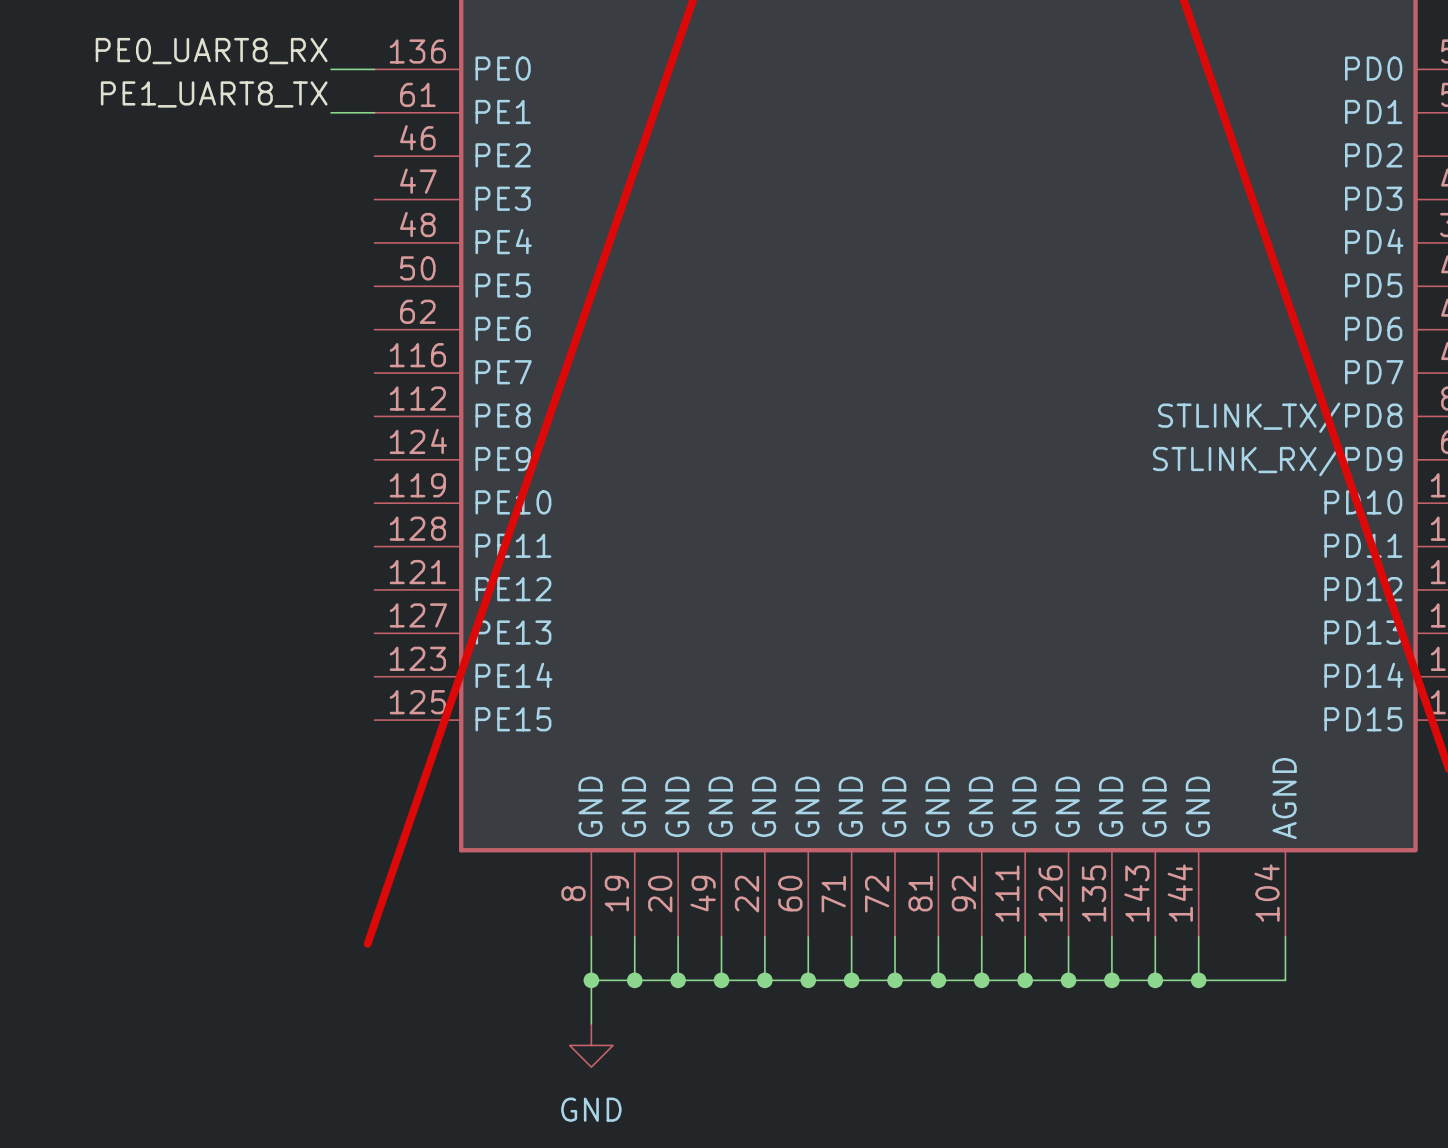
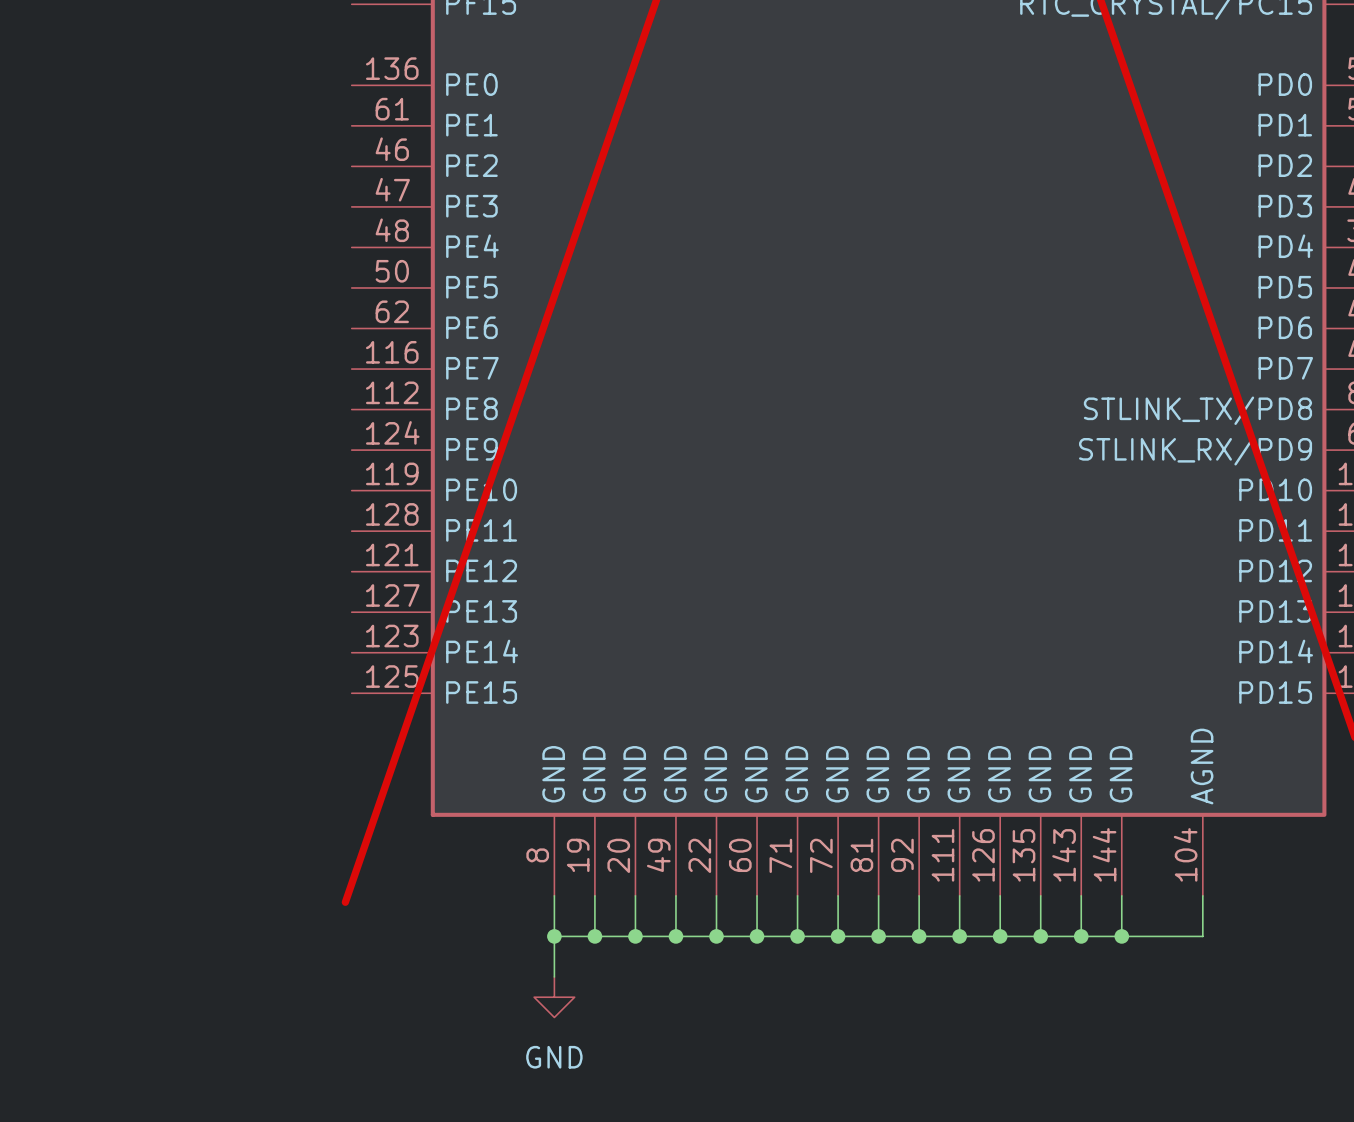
label: PE0_UART8_RX (211, 51) -> none
wire: (331, 69) (374, 69) -> none
label: PE1_UART8_TX (214, 94) -> none
wire: (331, 112) (374, 112) -> none

